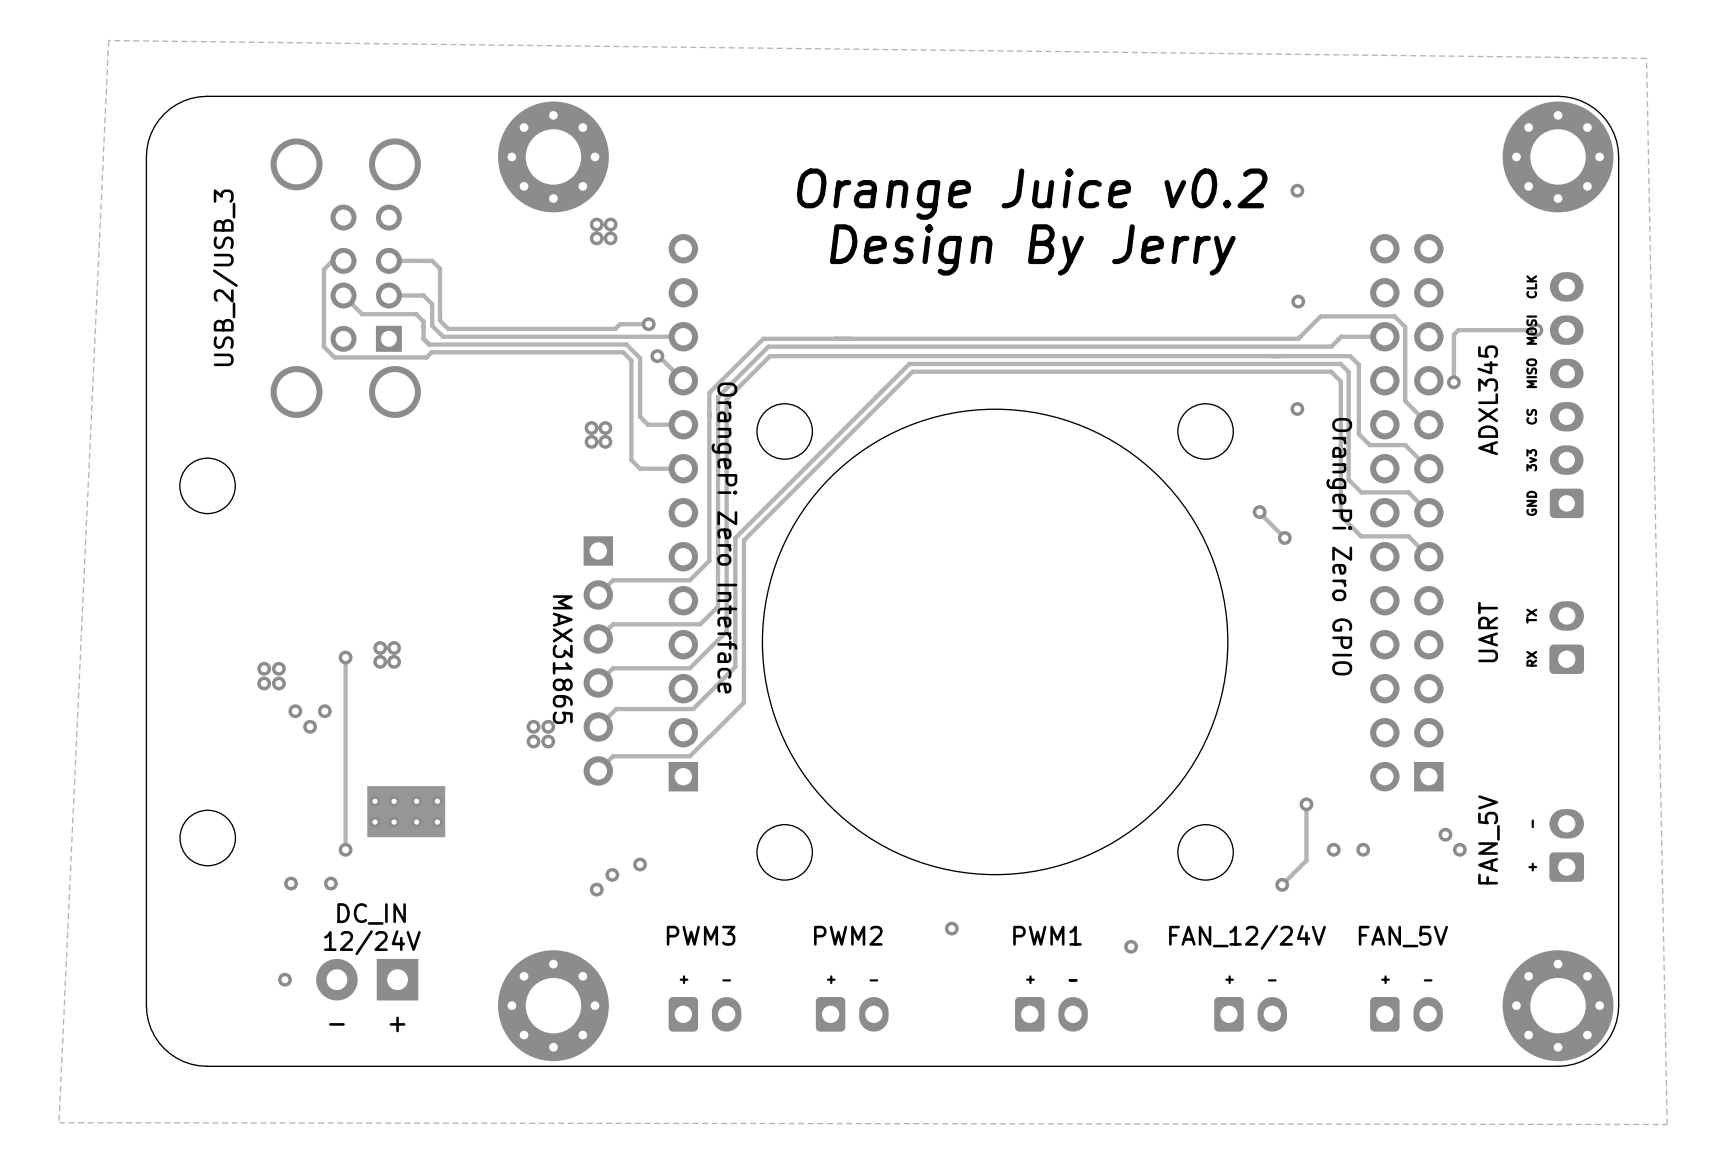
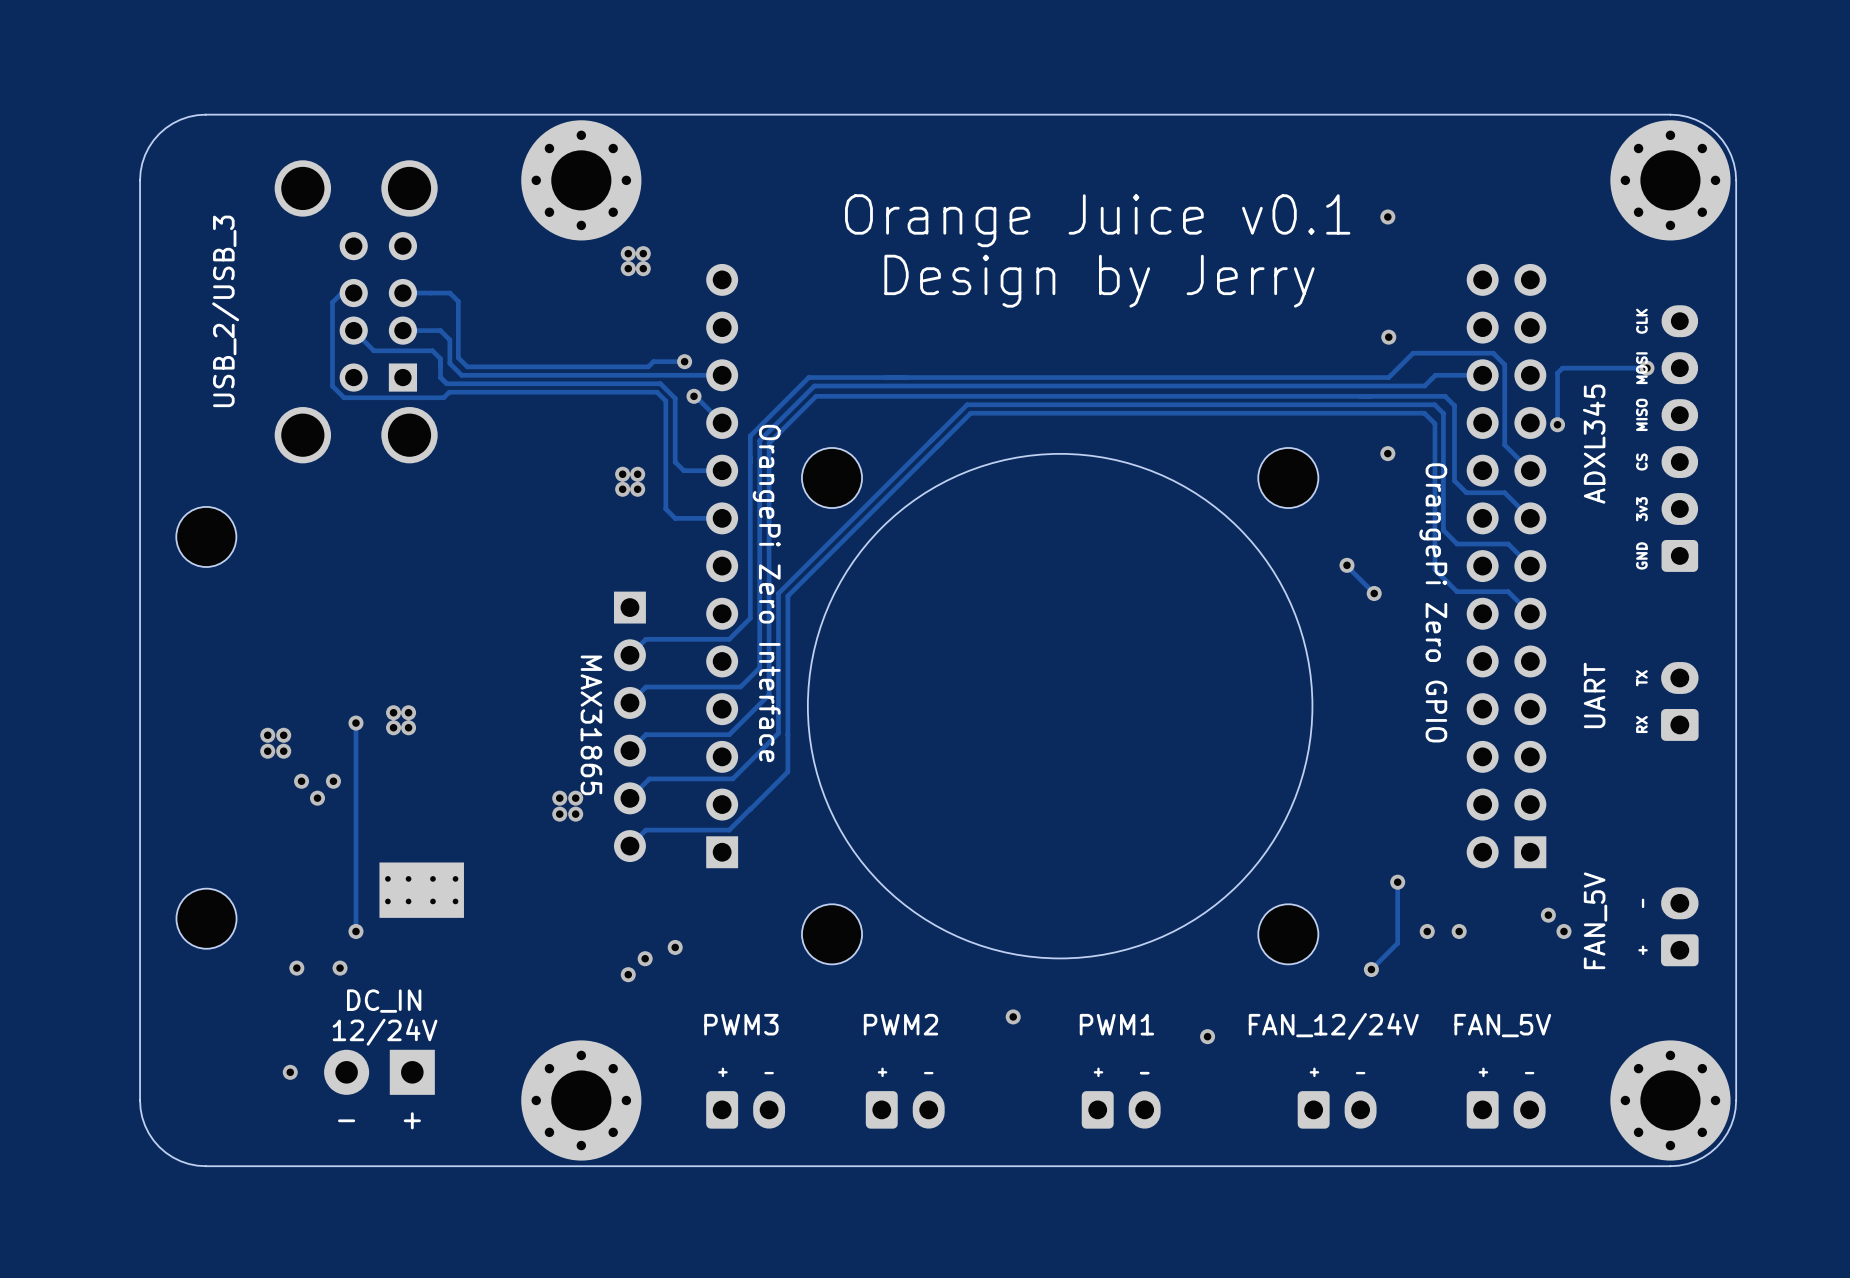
zone outline: (108, 40) (1646, 58) (1667, 1124) (58, 1122) (108, 40) -> none
text: Orange Juice v0.2 (1032, 194) -> Orange Juice v0.1 (1097, 220)
text: Design By Jerry (1032, 249) -> Design by Jerry (1099, 281)

